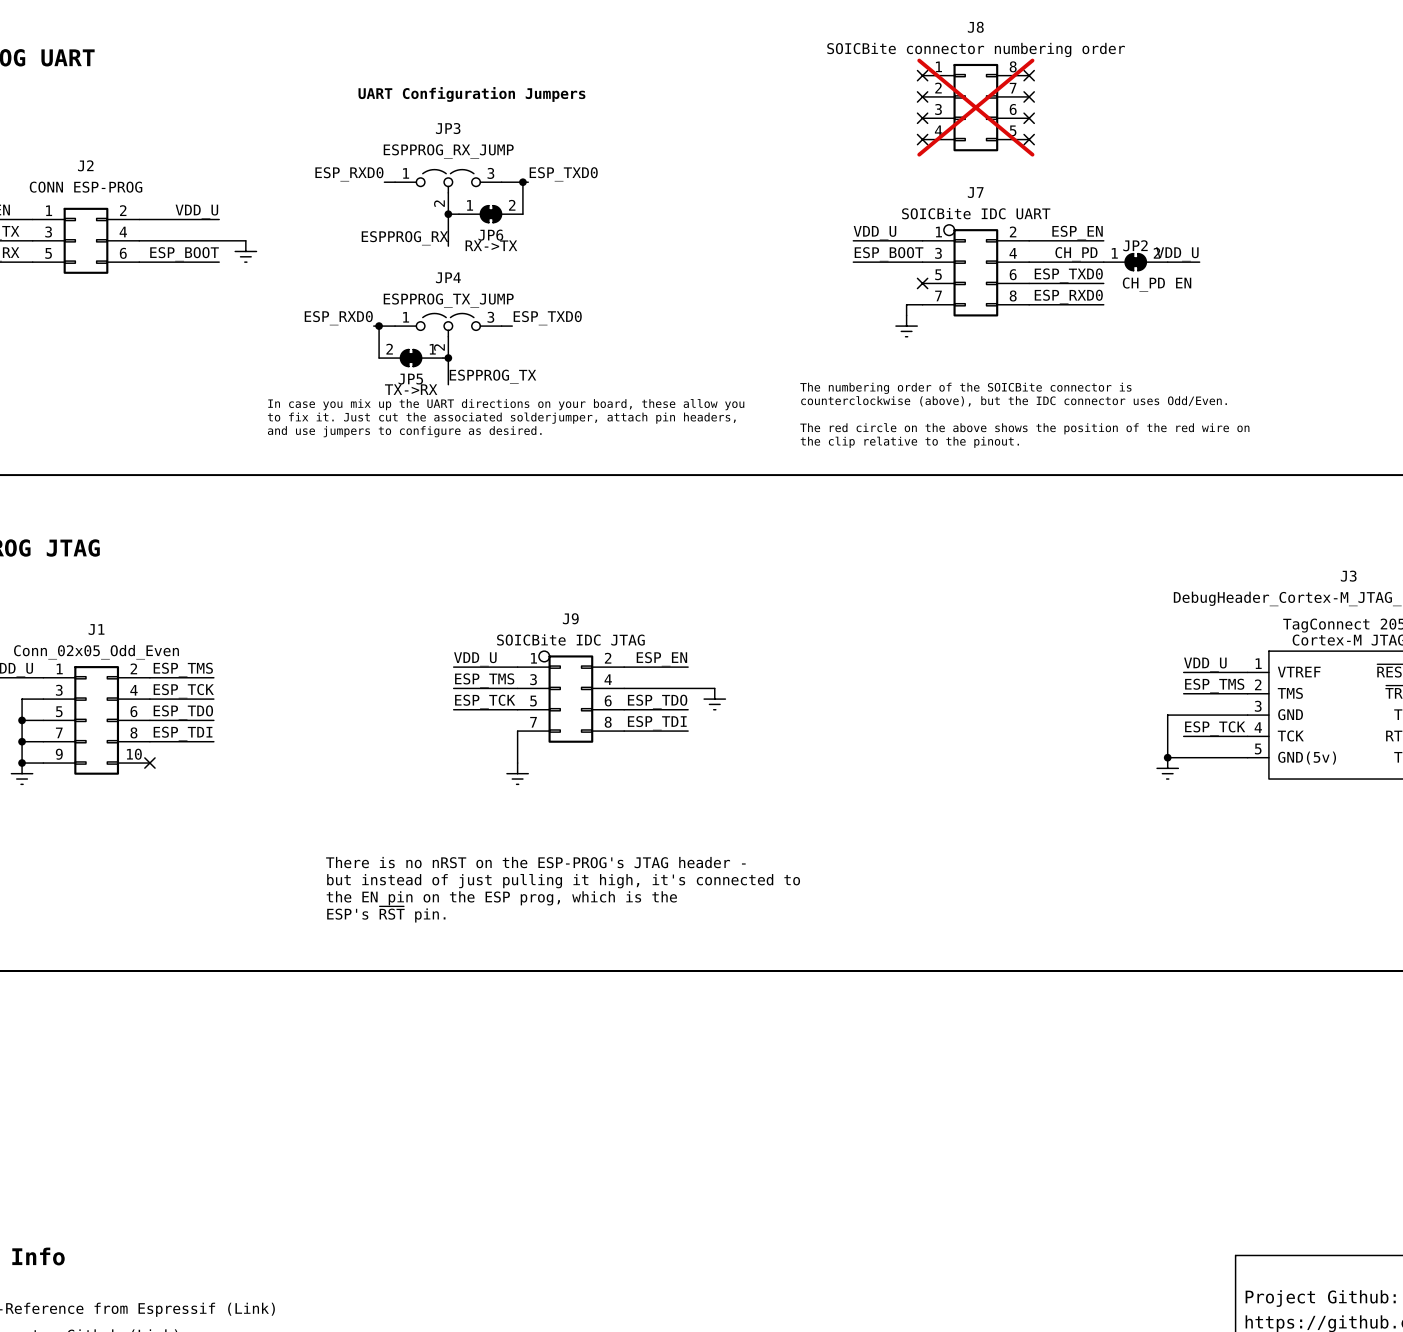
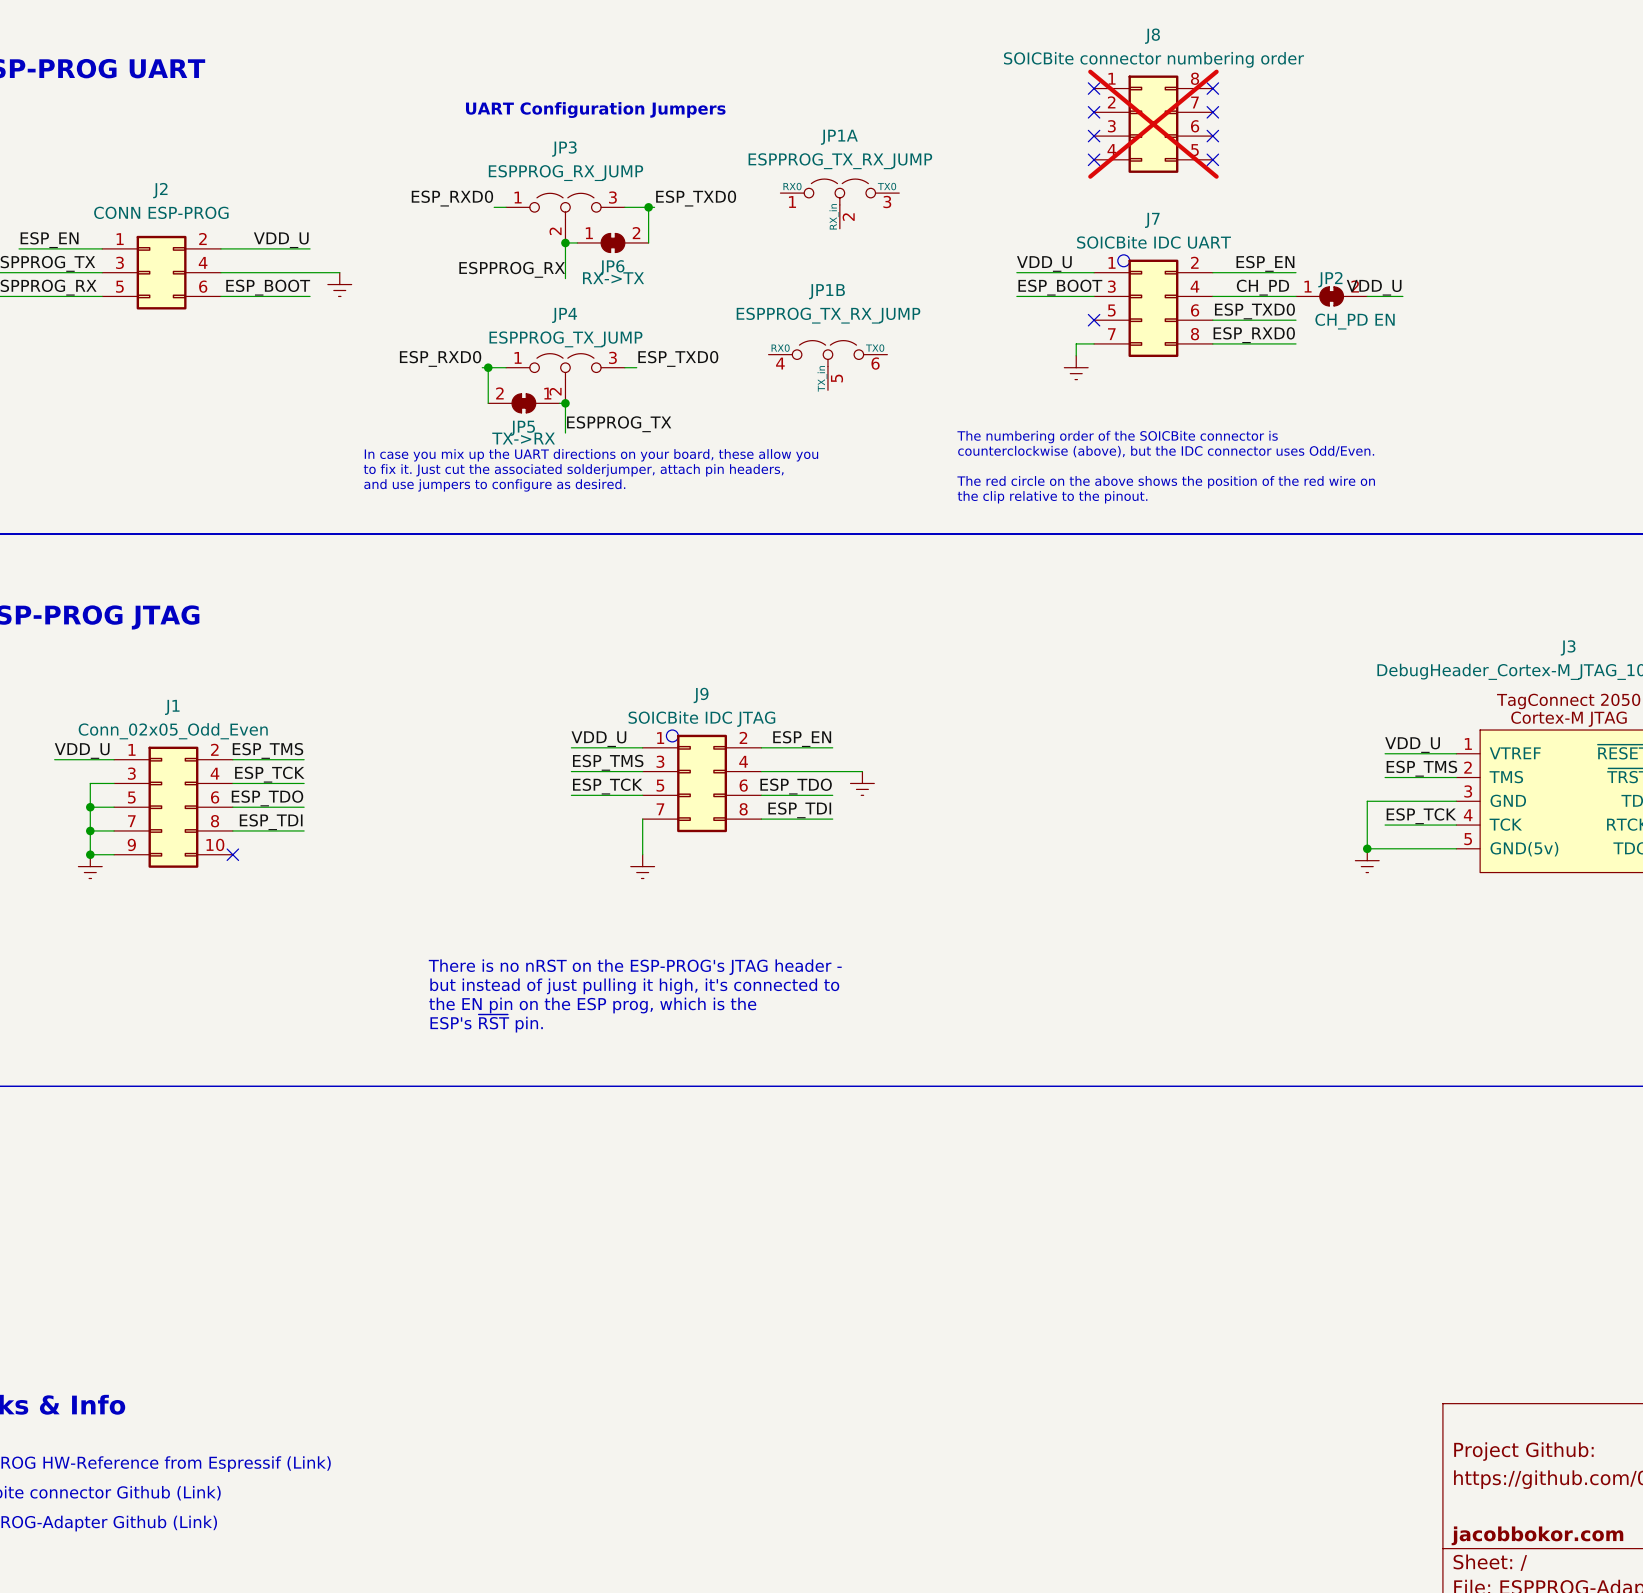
JP1A: none -> ESPPROG_TX_RX_JUMP (839, 203)
JP1B: none -> ESPPROG_TX_RX_JUMP (827, 365)

